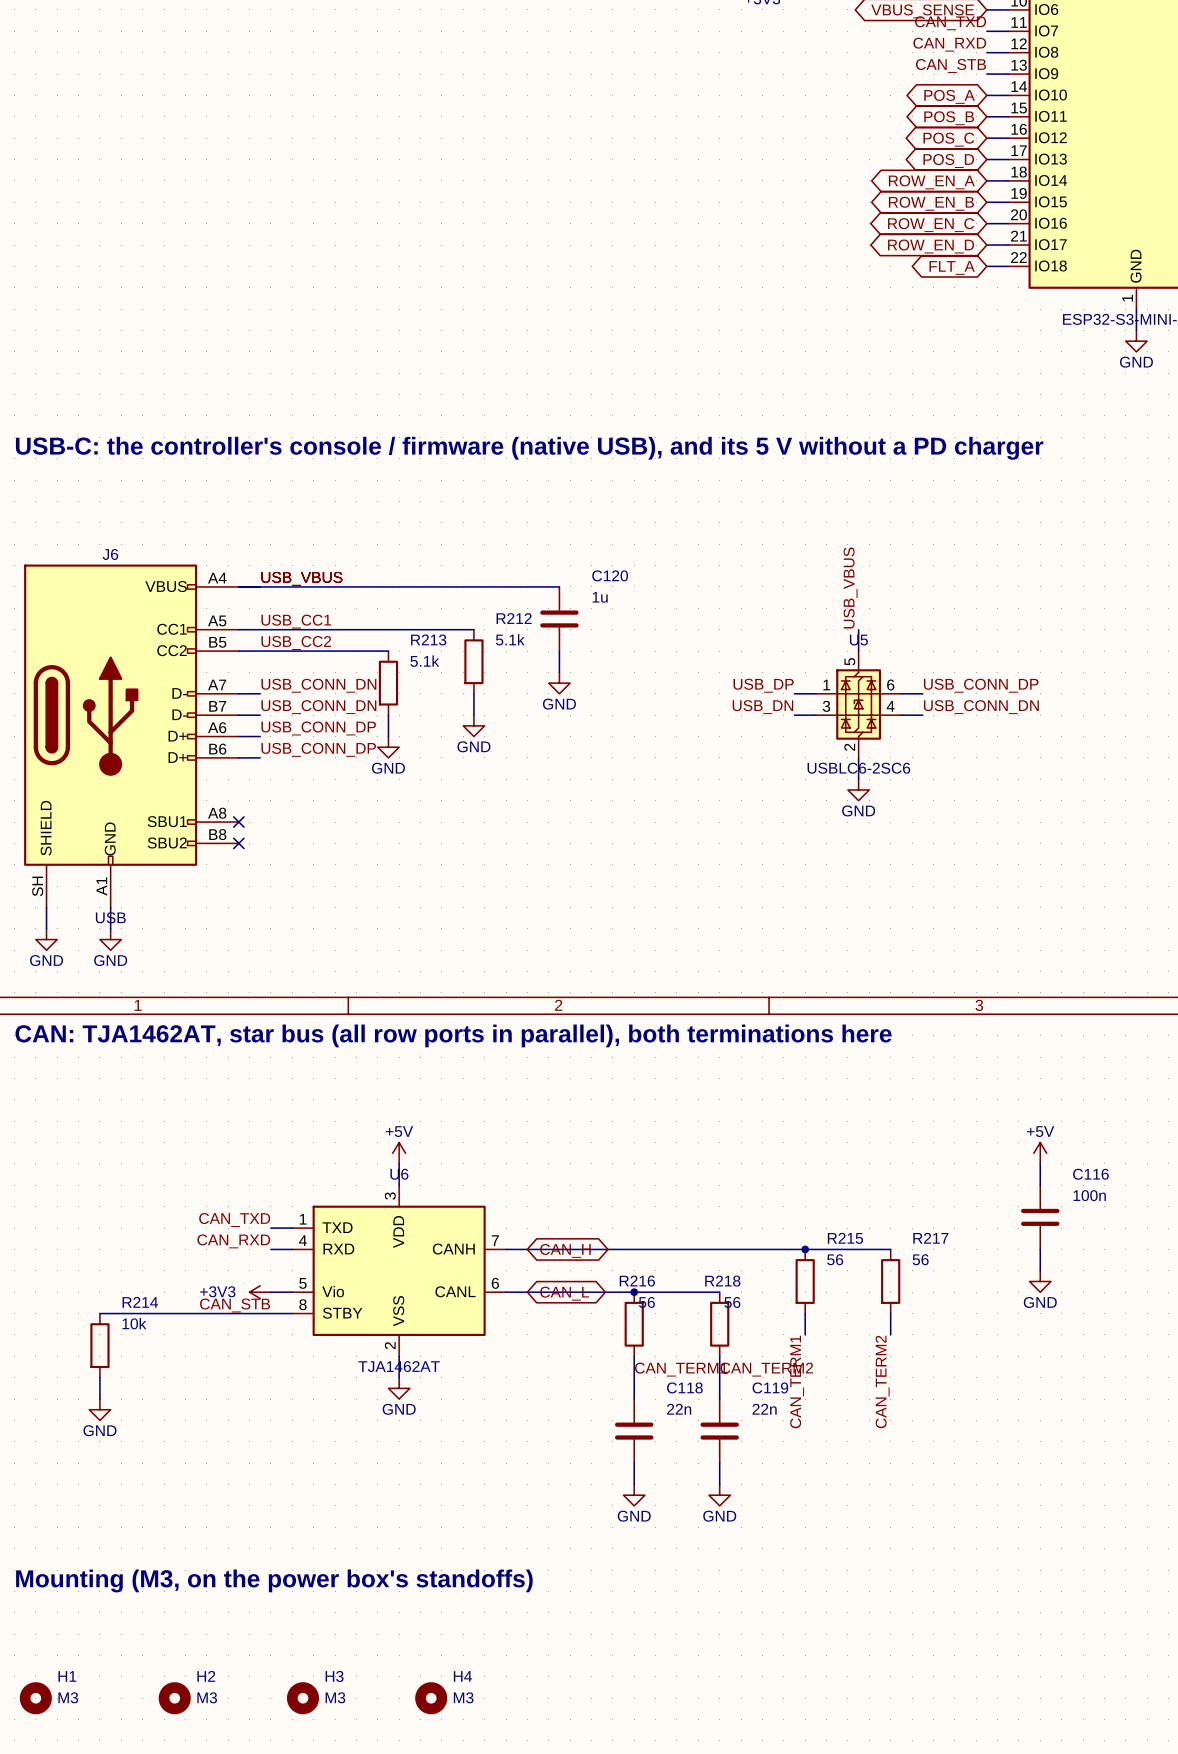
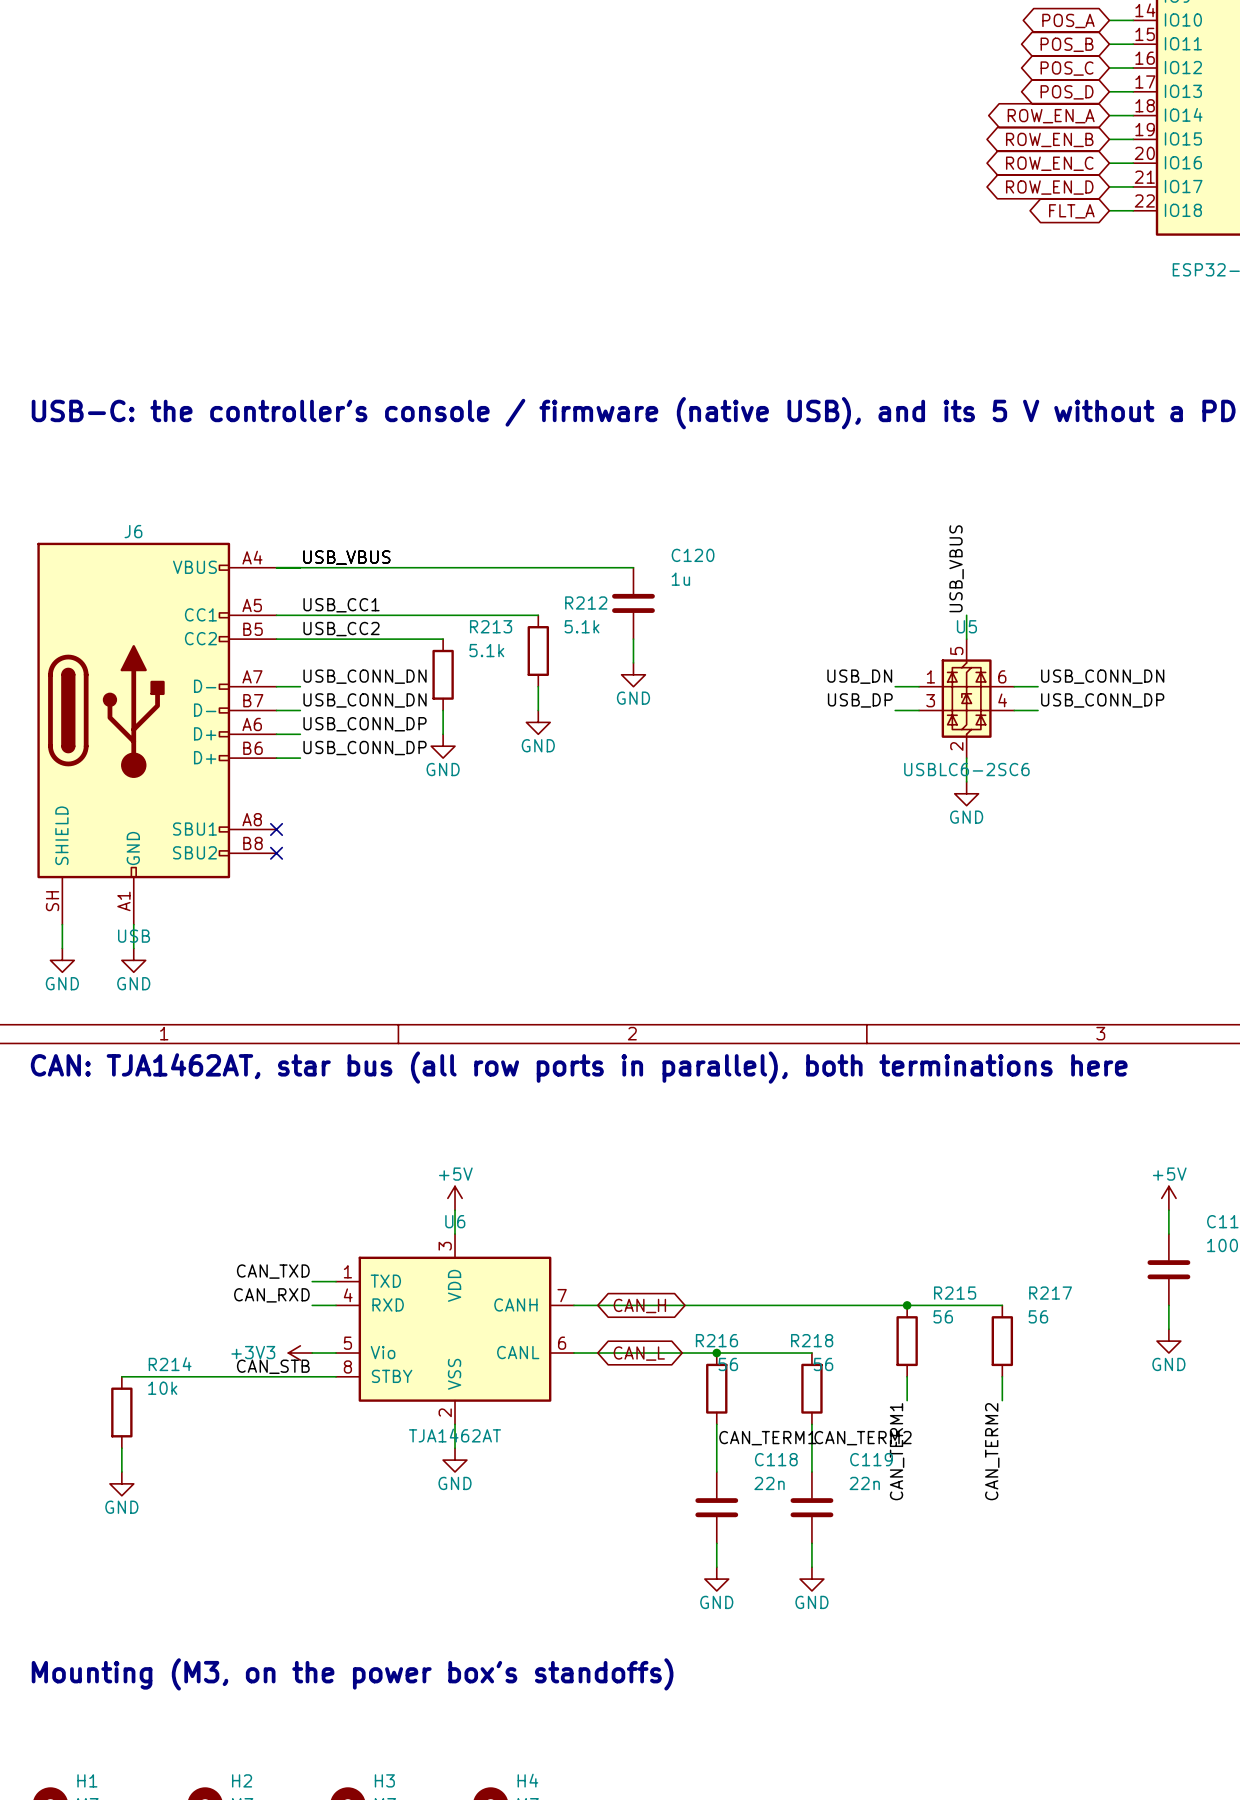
label: USB_DP (763, 685) -> USB_DN (859, 676)
label: USB_CONN_DP (981, 685) -> USB_CONN_DN (1102, 676)
label: USB_DN (762, 707) -> USB_DP (860, 700)
label: USB_CONN_DN (981, 707) -> USB_CONN_DP (1102, 700)

